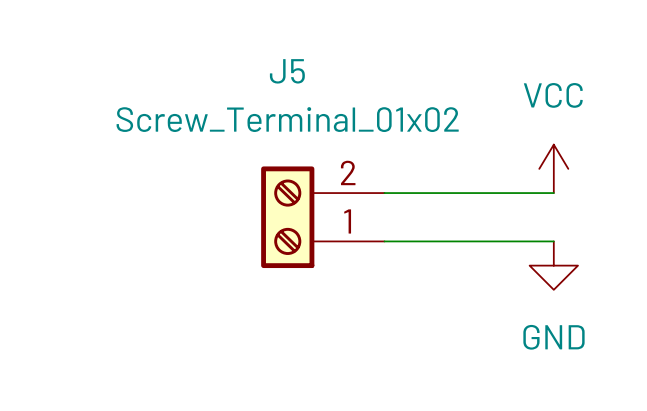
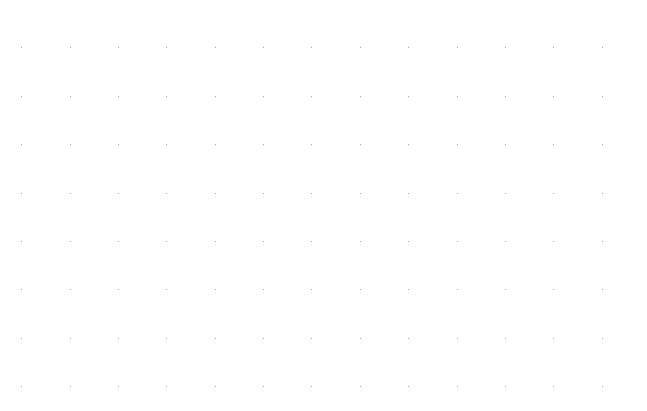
power symbol: VCC (553, 168) -> none
wire: (384, 193) (553, 193) -> none
J5: Screw_Terminal_01x02 (322, 217) -> none
wire: (384, 241) (553, 241) -> none
power symbol: GND (553, 265) -> none

